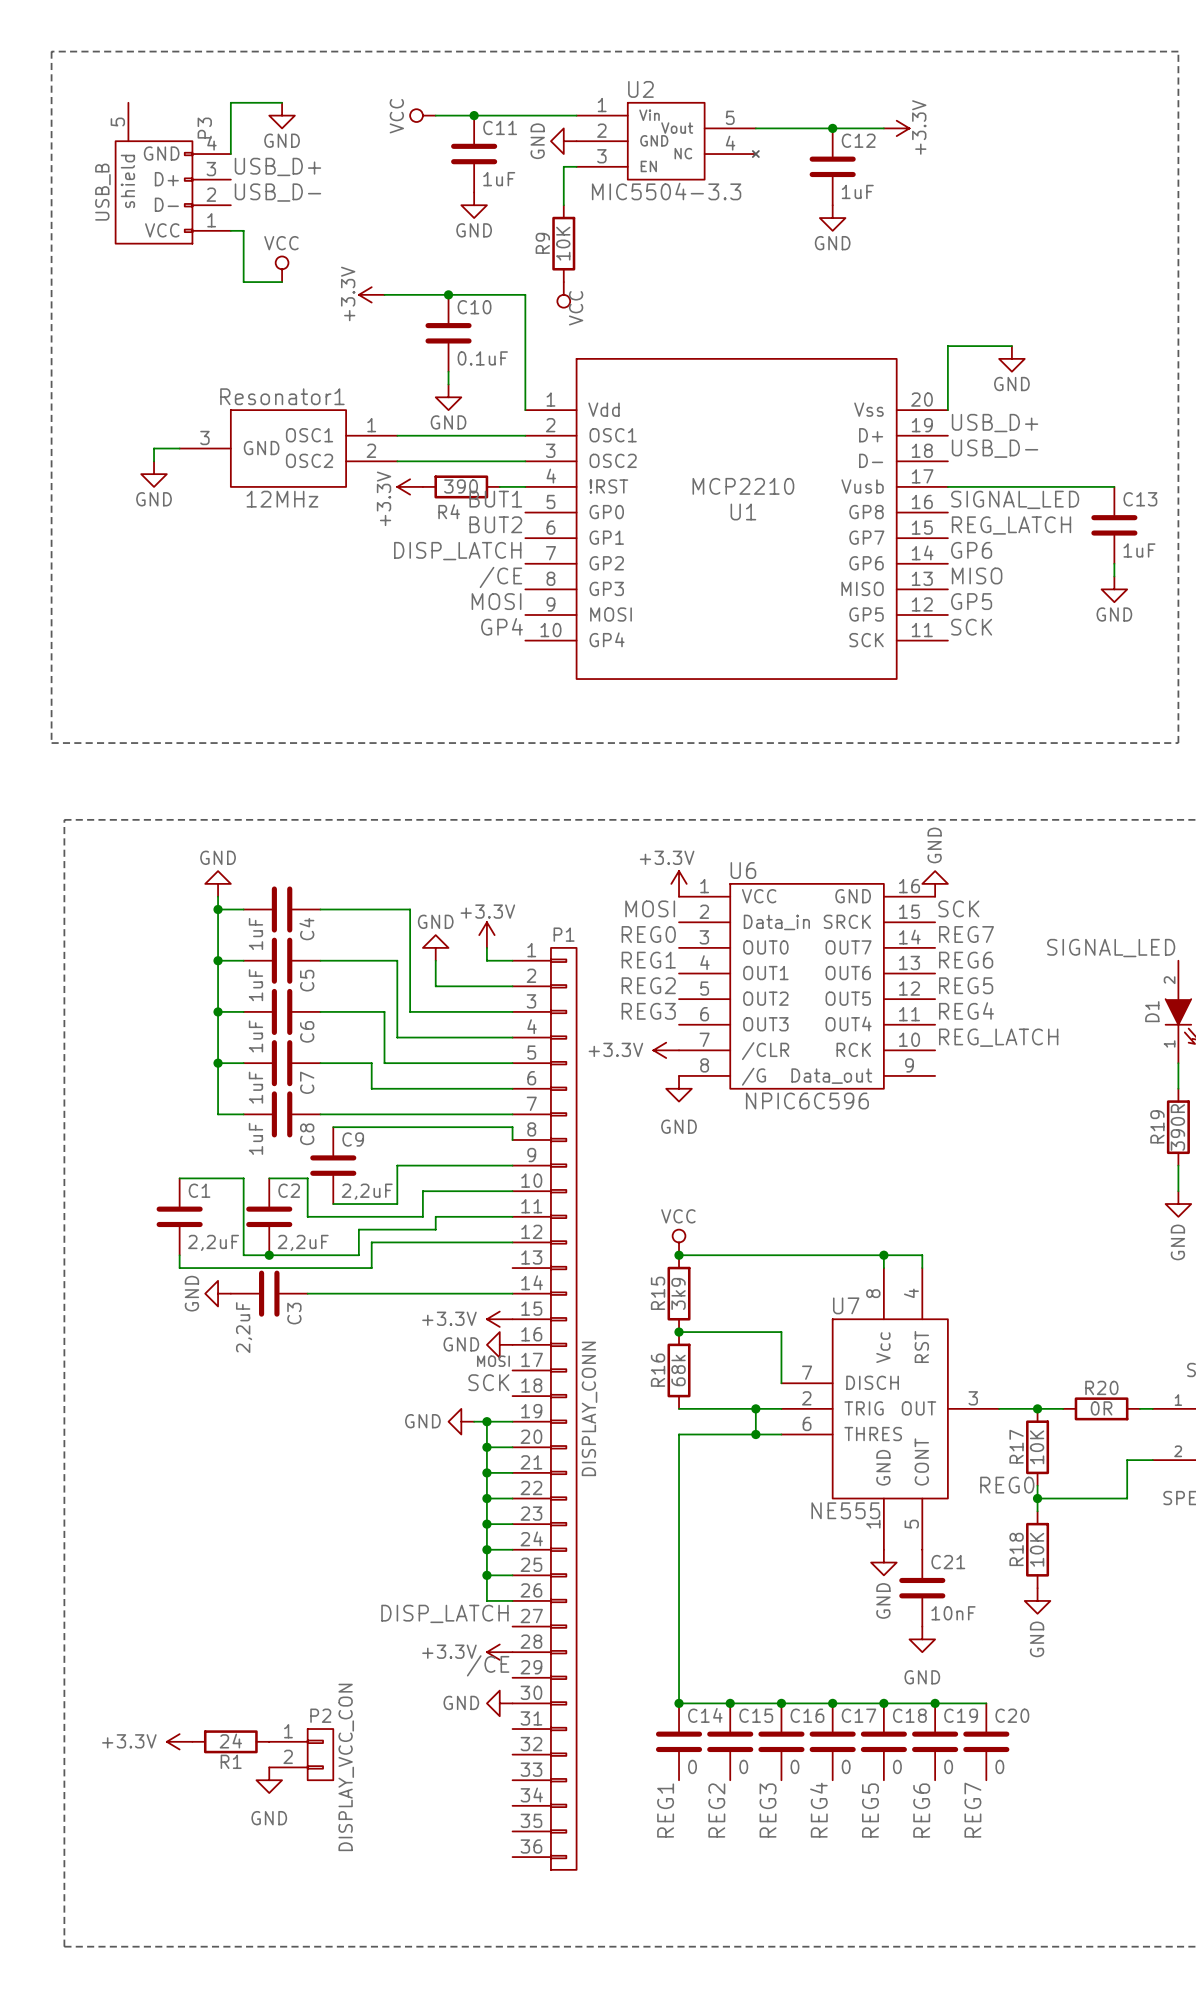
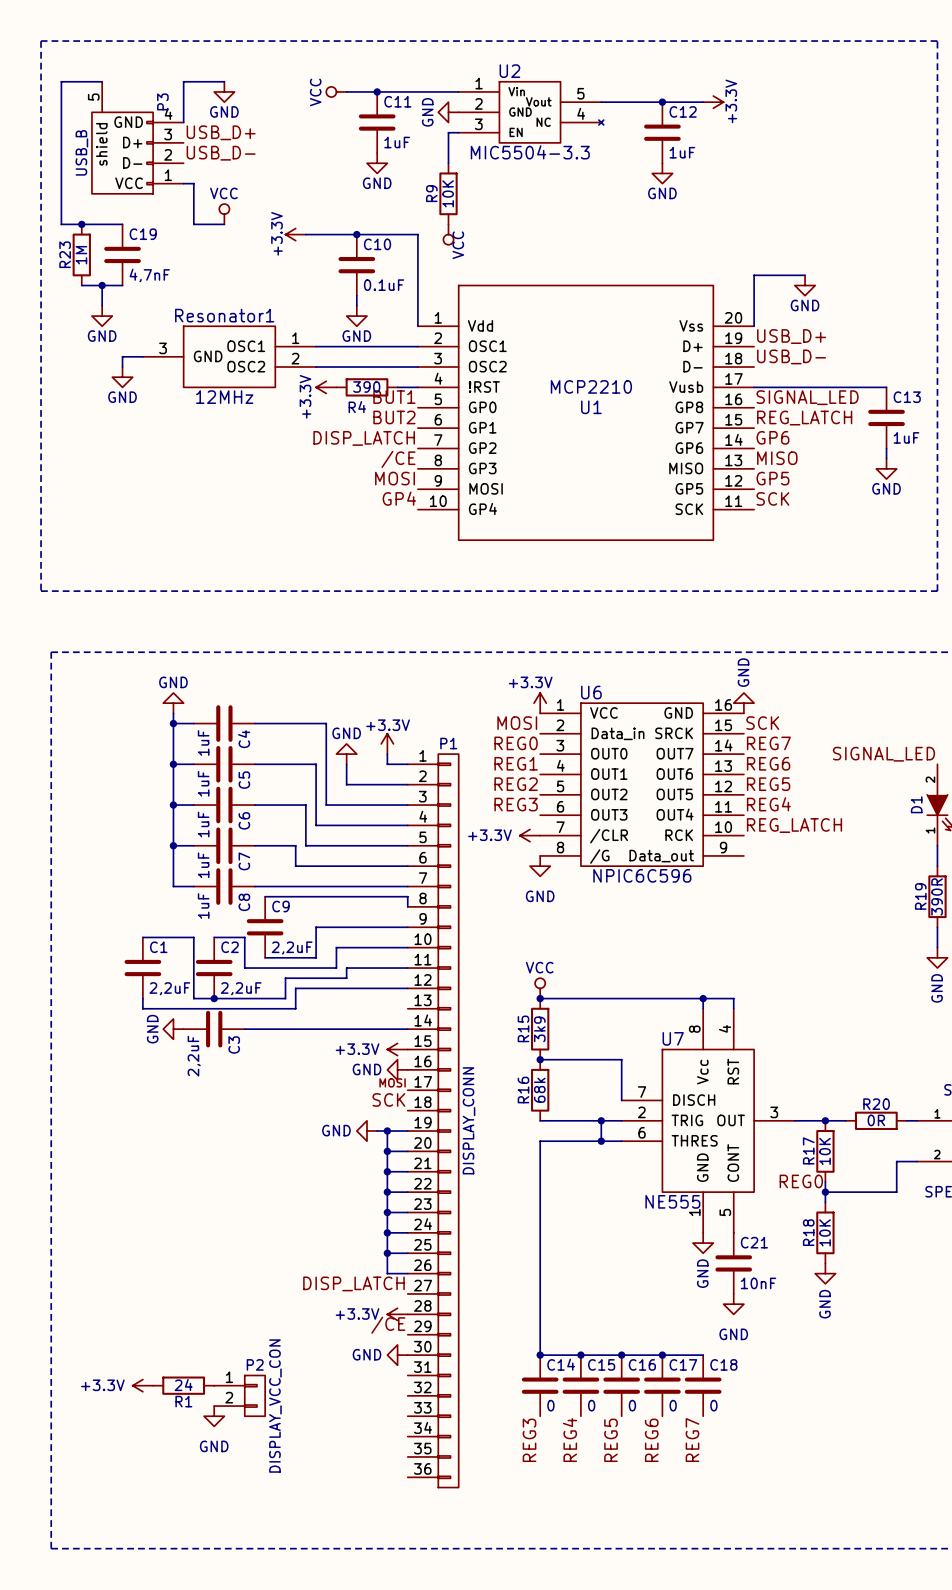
wire: none -> (102, 81) (61, 81) (61, 224) (122, 224)
junction: none -> (81, 224)
R23: none -> 1M (81, 254)
wire: none -> (81, 285) (122, 285)
wire: none -> (102, 285) (102, 305)
junction: none -> (102, 285)
power symbol: none -> GND (102, 316)
wire: (883, 1703) (986, 1703) -> none
junction: (883, 1703) -> none
junction: (935, 1703) -> none
C19 position: (935, 1741) -> (122, 254)
C20: 0 (986, 1741) -> none
C19 value: 0 (948, 1766) -> 4,7nF (149, 275)
label: REG1 (665, 1810) -> REG3 (529, 1440)
label: REG2 (716, 1810) -> REG4 (569, 1440)
label: REG3 (768, 1810) -> REG5 (611, 1440)
label: REG4 (818, 1810) -> REG6 (651, 1440)
label: REG5 (870, 1810) -> REG7 (692, 1440)
label: REG6 (921, 1810) -> none
label: REG7 (972, 1810) -> none

